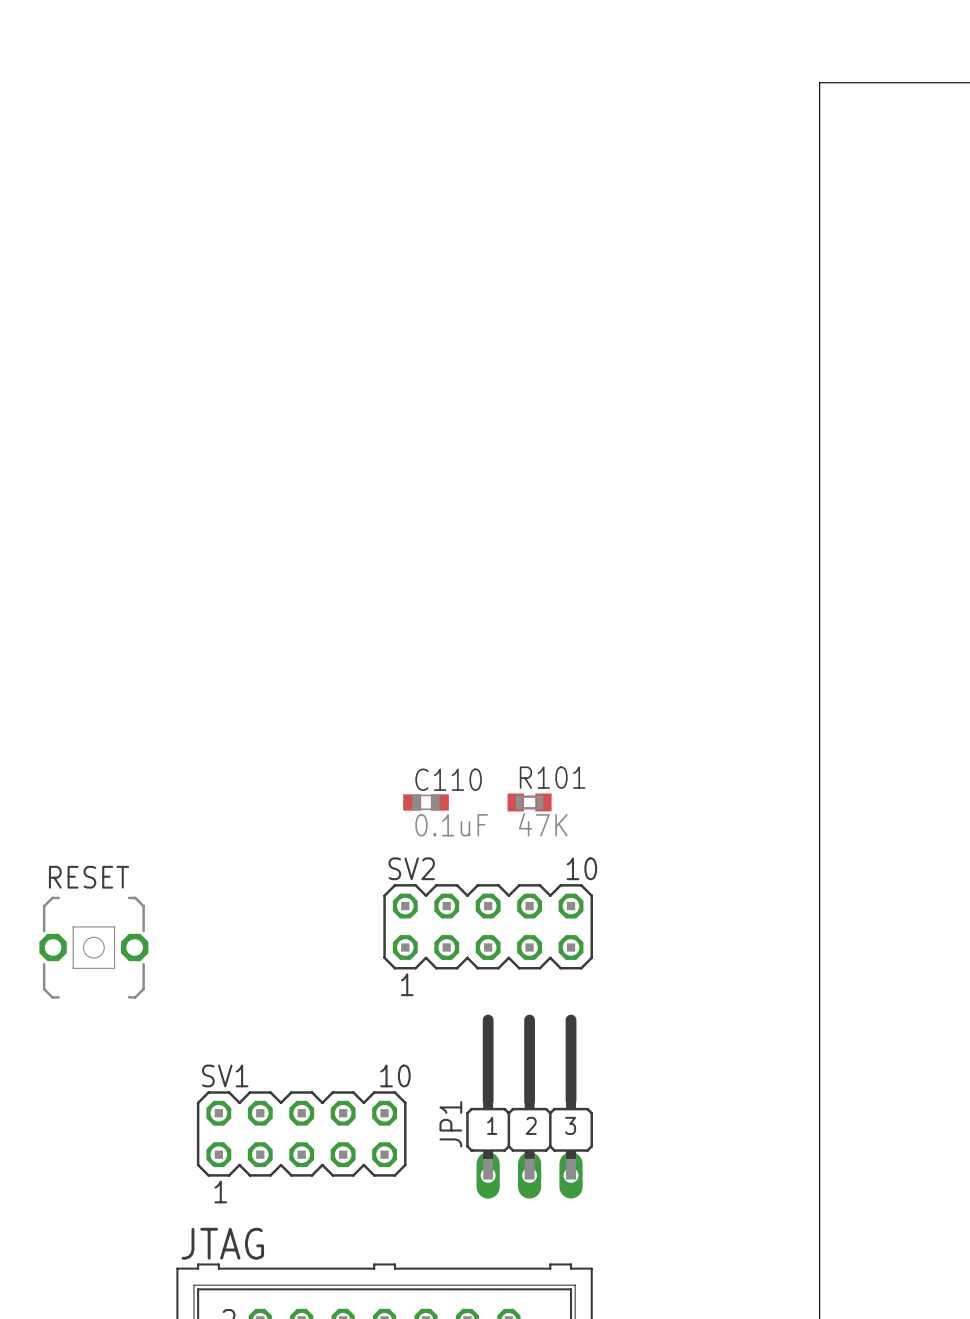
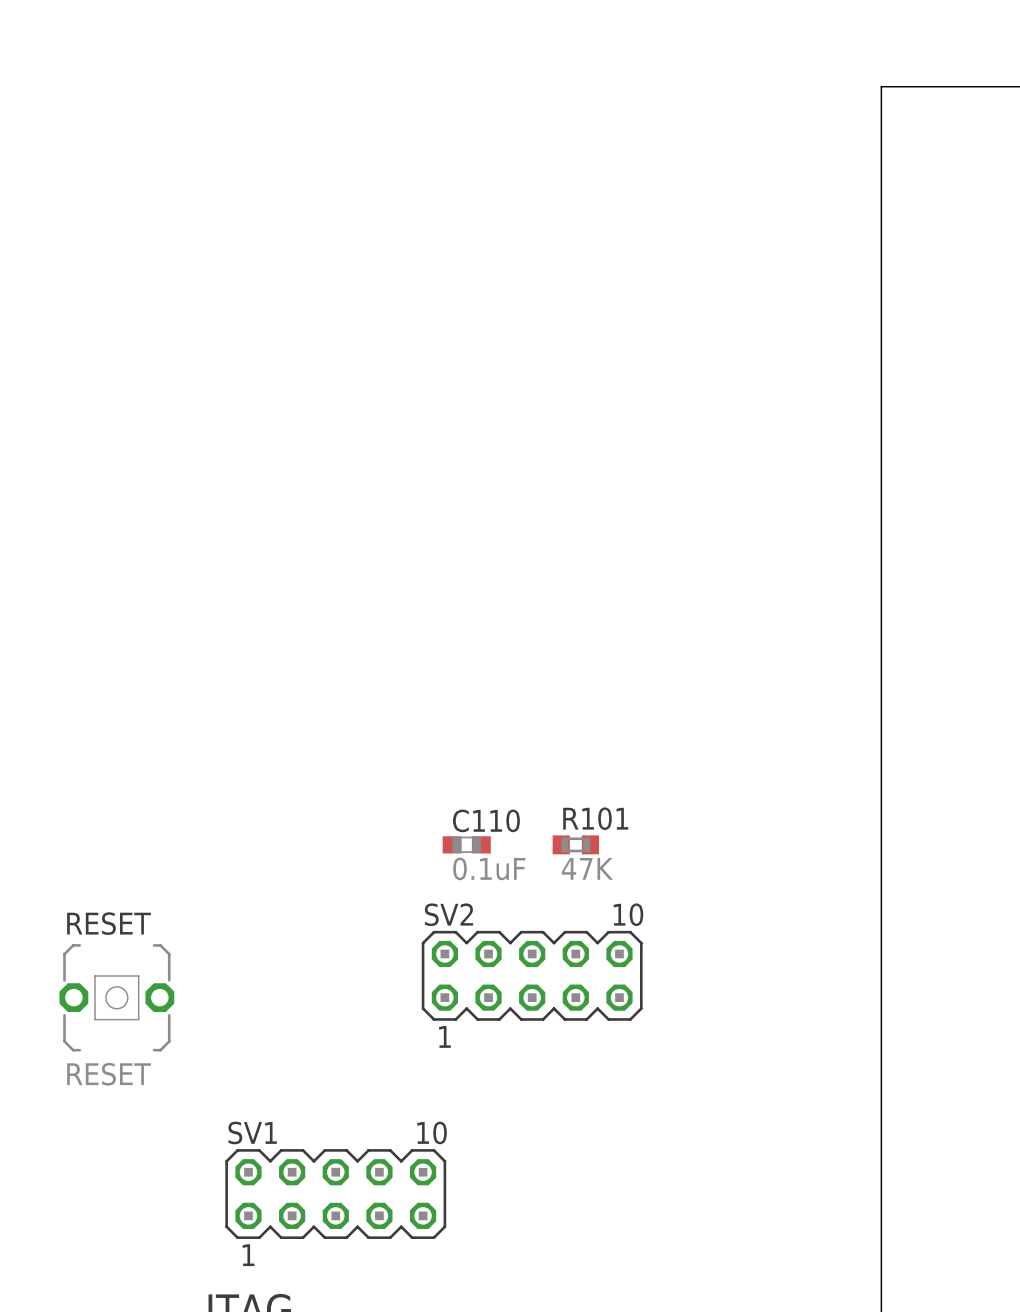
RESET value: none -> RESET (109, 1074)
JP1: (529, 1106) -> none

